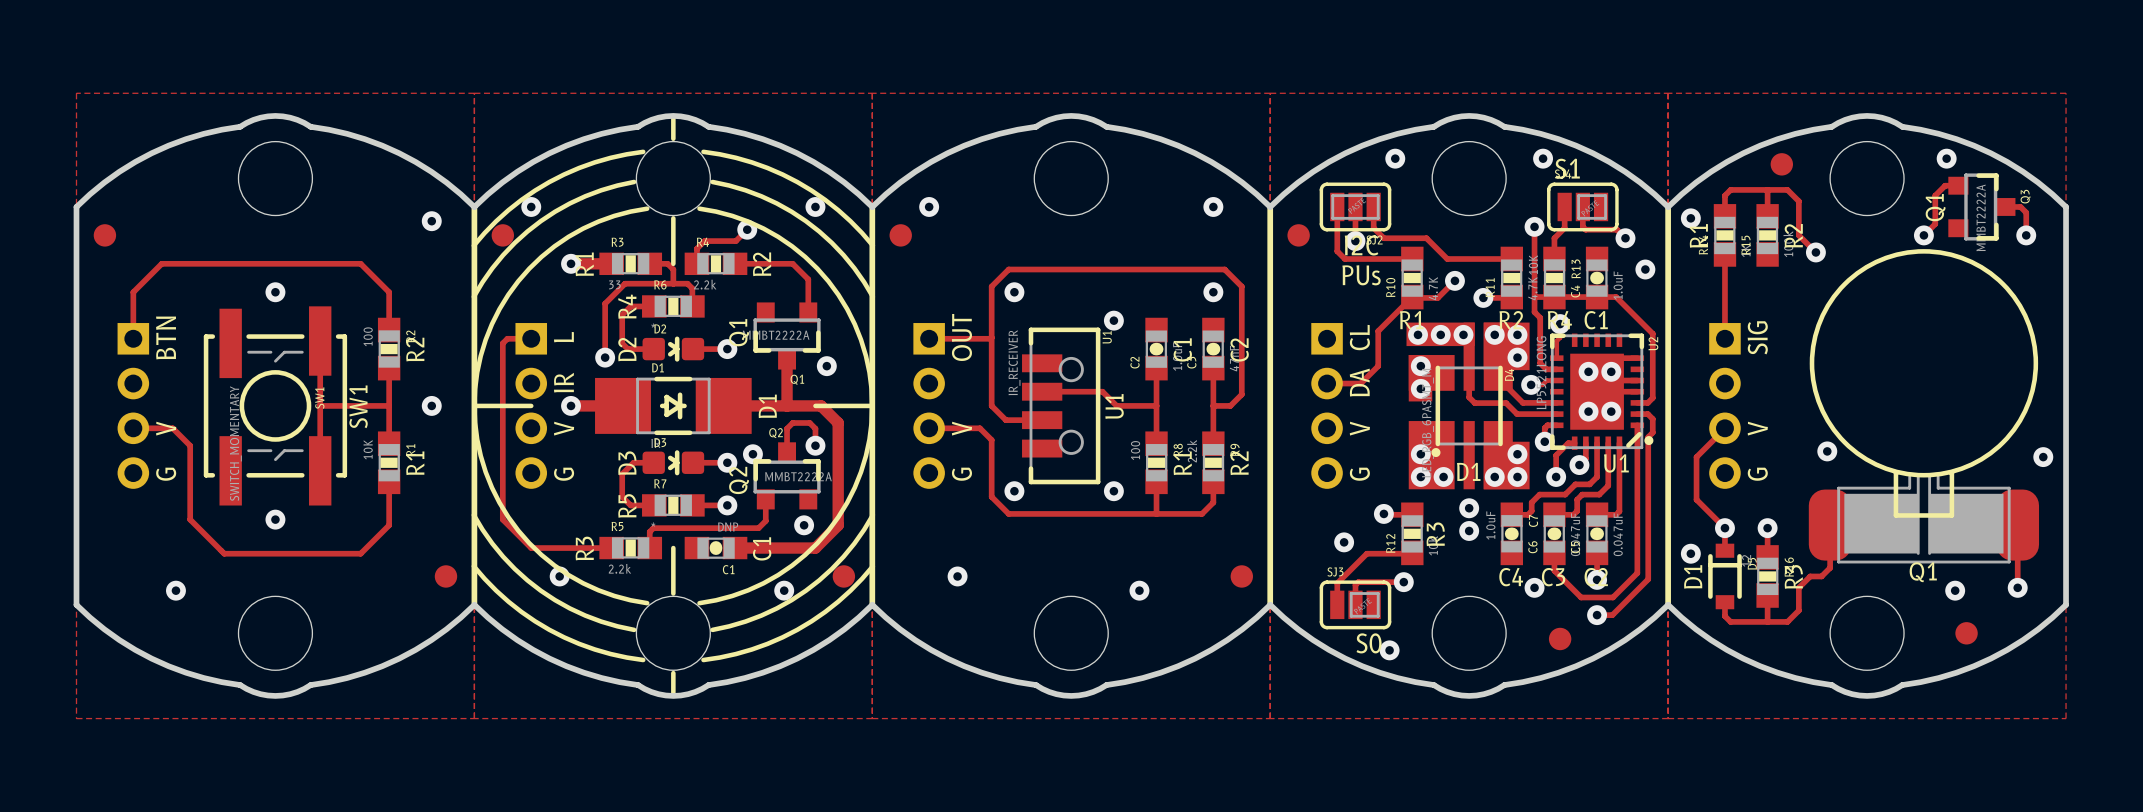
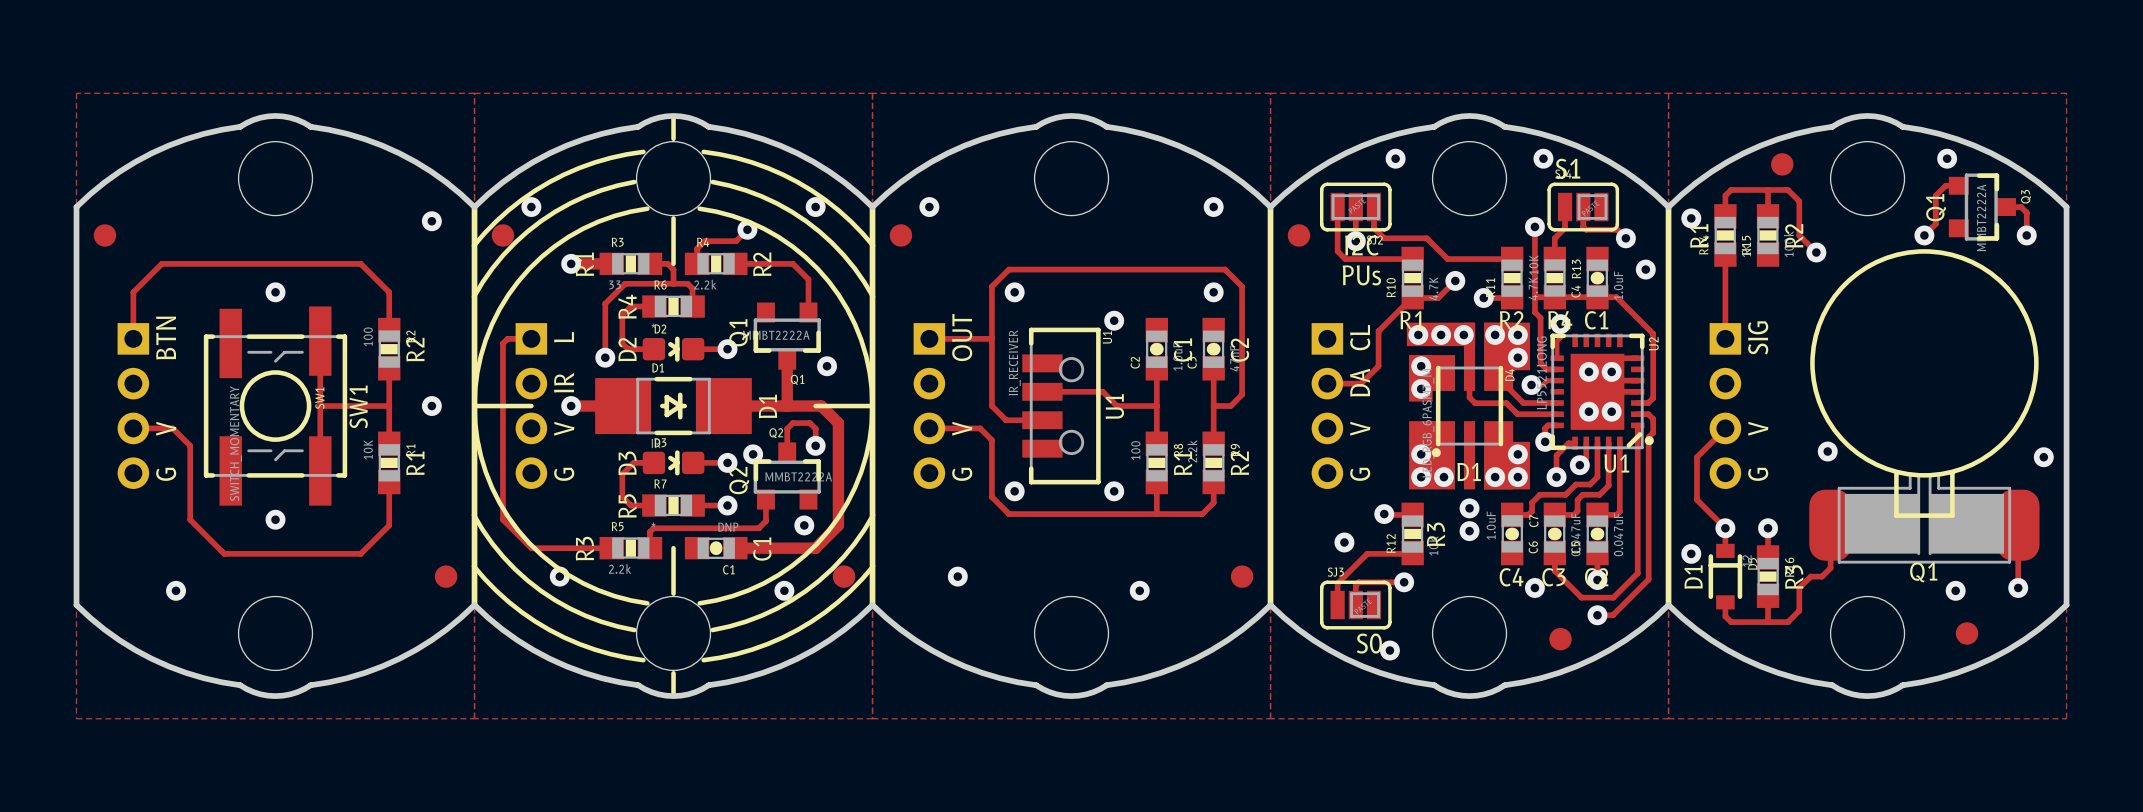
SW1 footprint: [203, 306, 348, 506] -> [203, 306, 348, 506]

